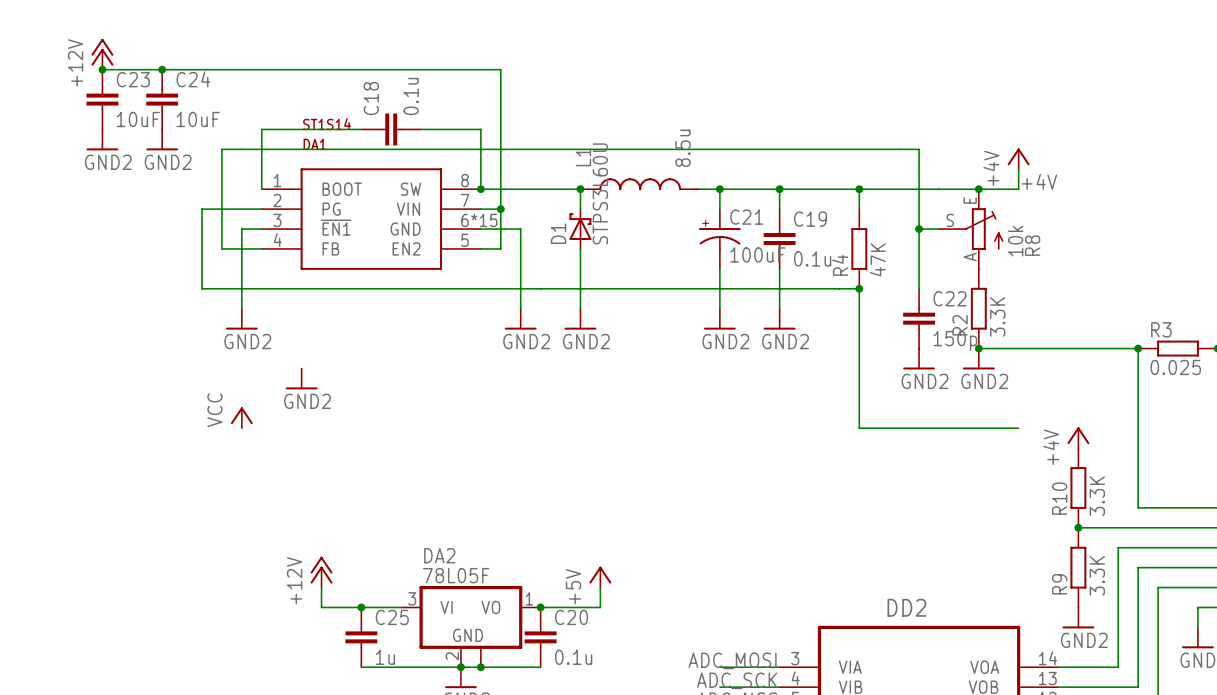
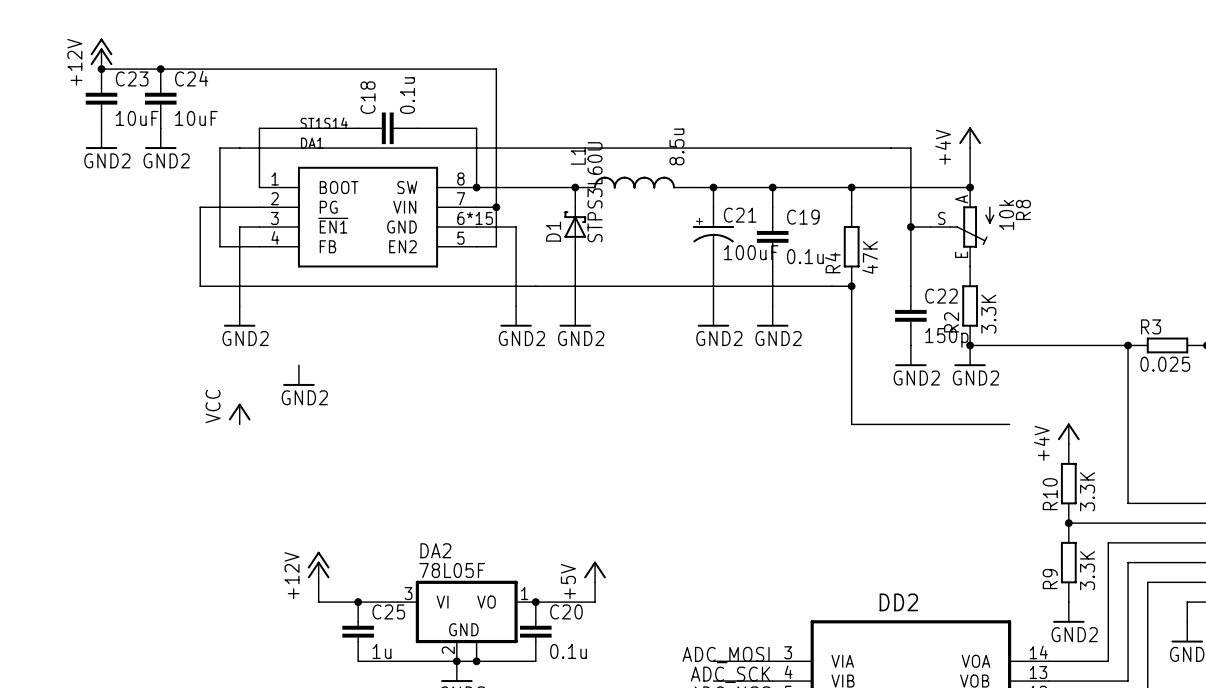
power symbol position: +4V (1018, 158) -> +4V (970, 137)
wire: (1018, 169) (1018, 189) (978, 189) -> (970, 148) (970, 187)
label: +4V (1039, 181) -> none
R8 flip: as is (980, 229) -> up-down (972, 227)

